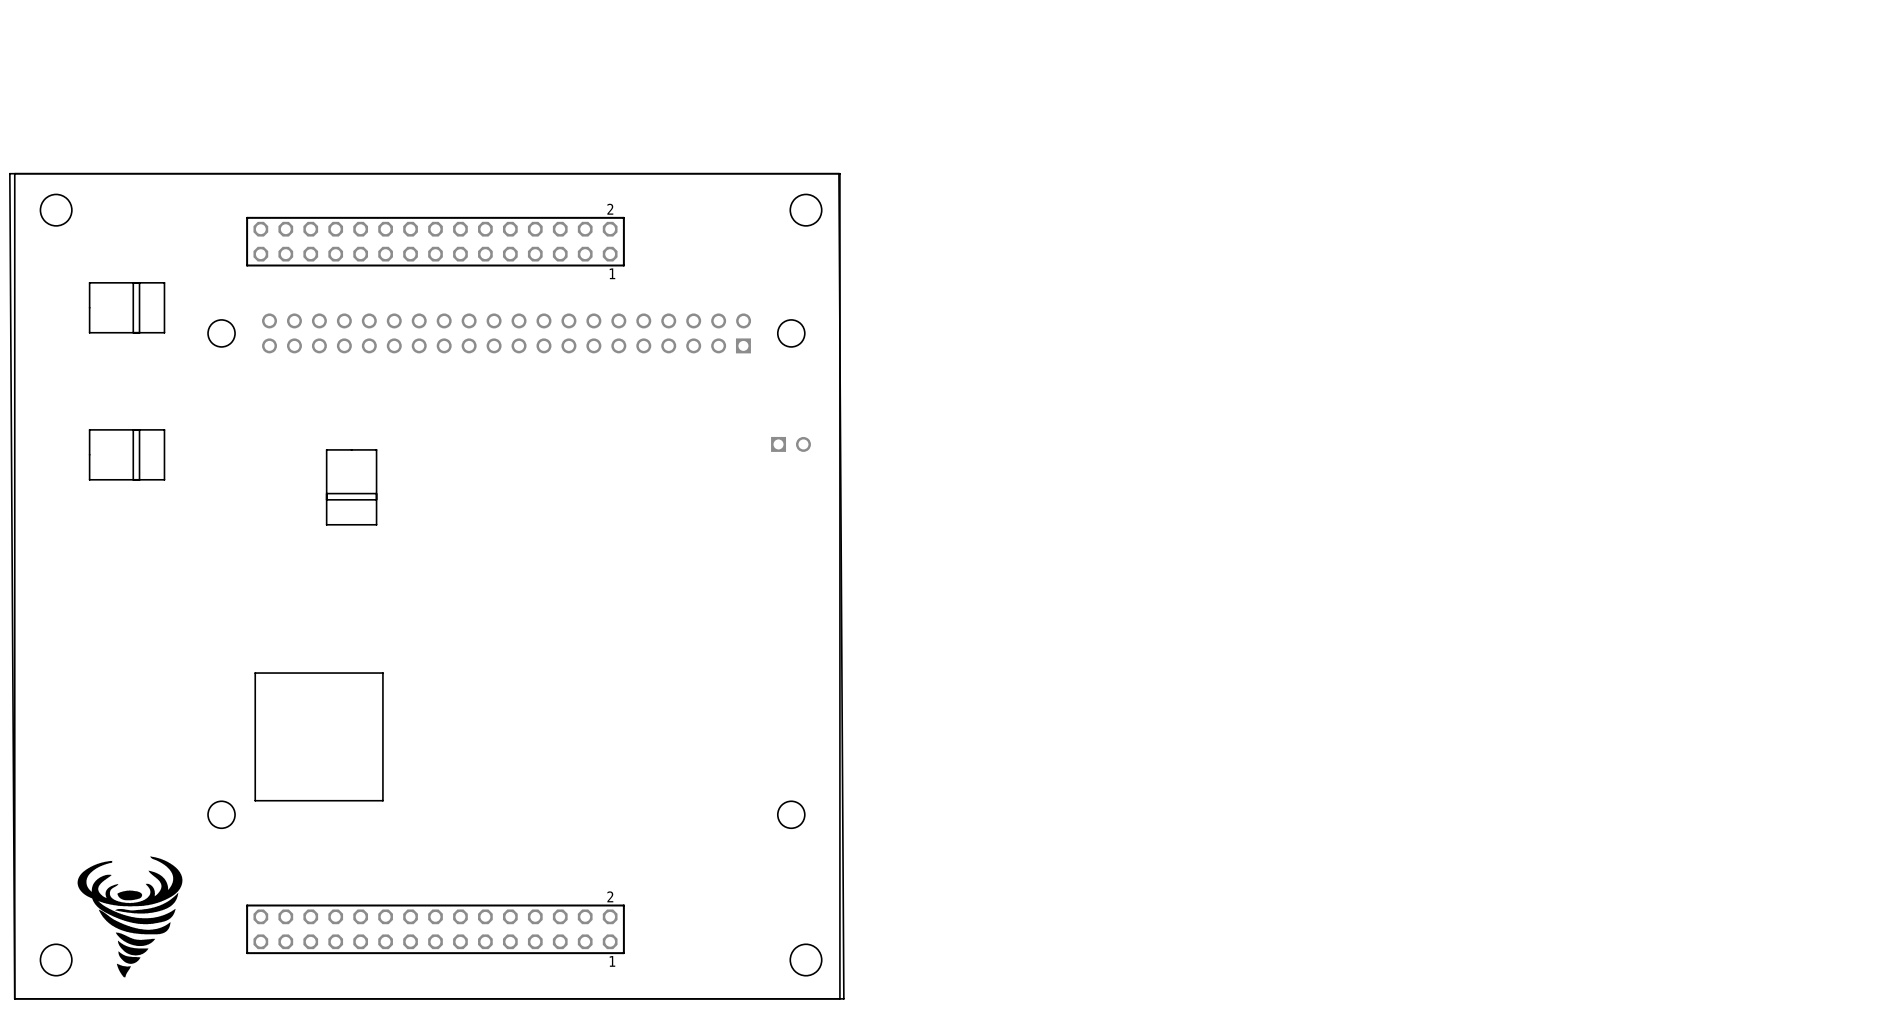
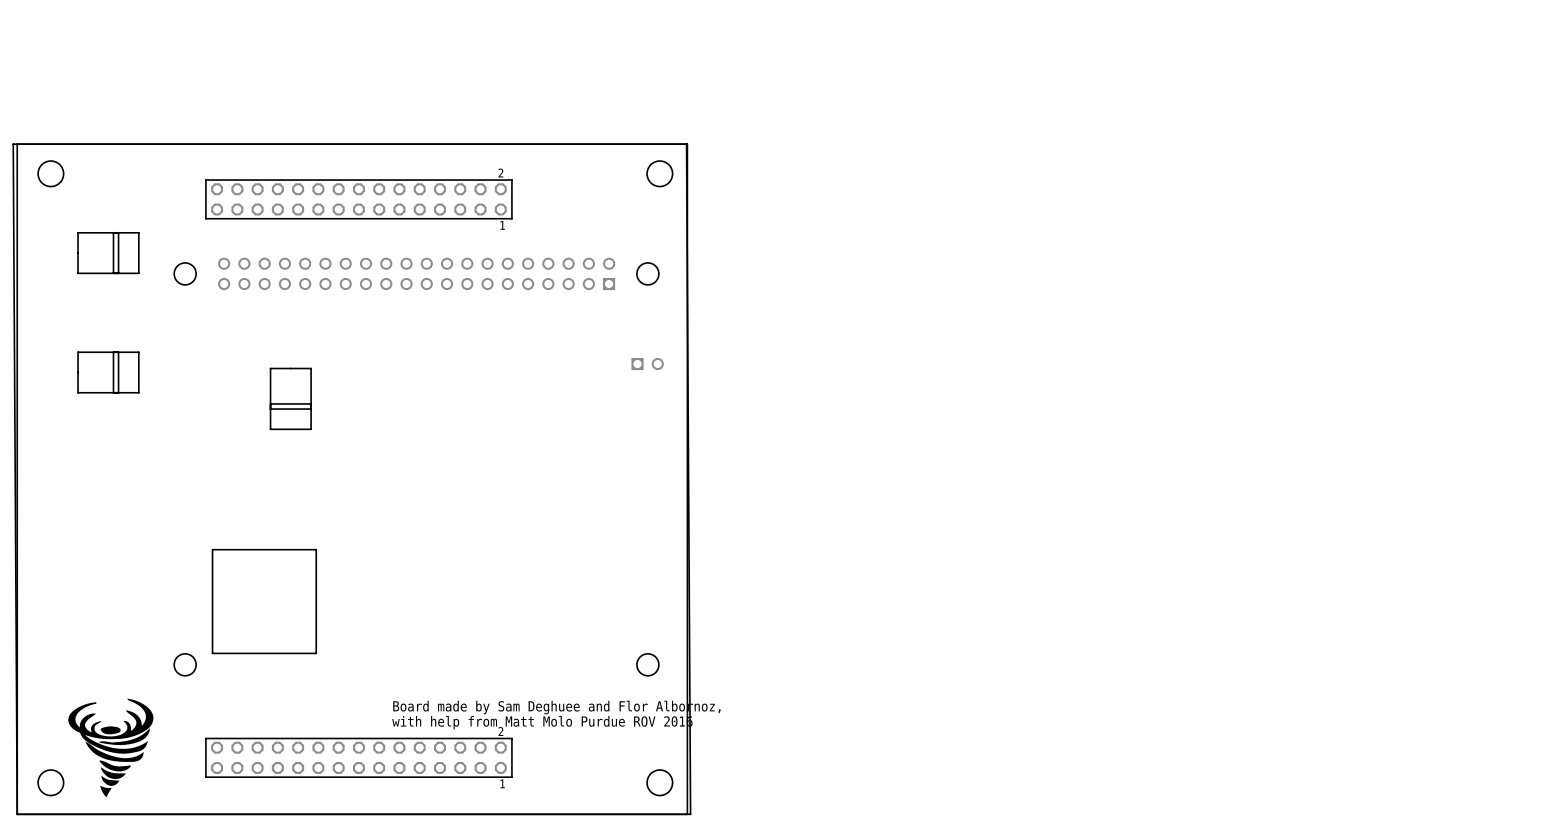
text: none -> Board made by Sam Deghuee and Flor Albornoz, (556, 707)
text: none -> with help from Matt Molo Purdue ROV 2016 (542, 722)

